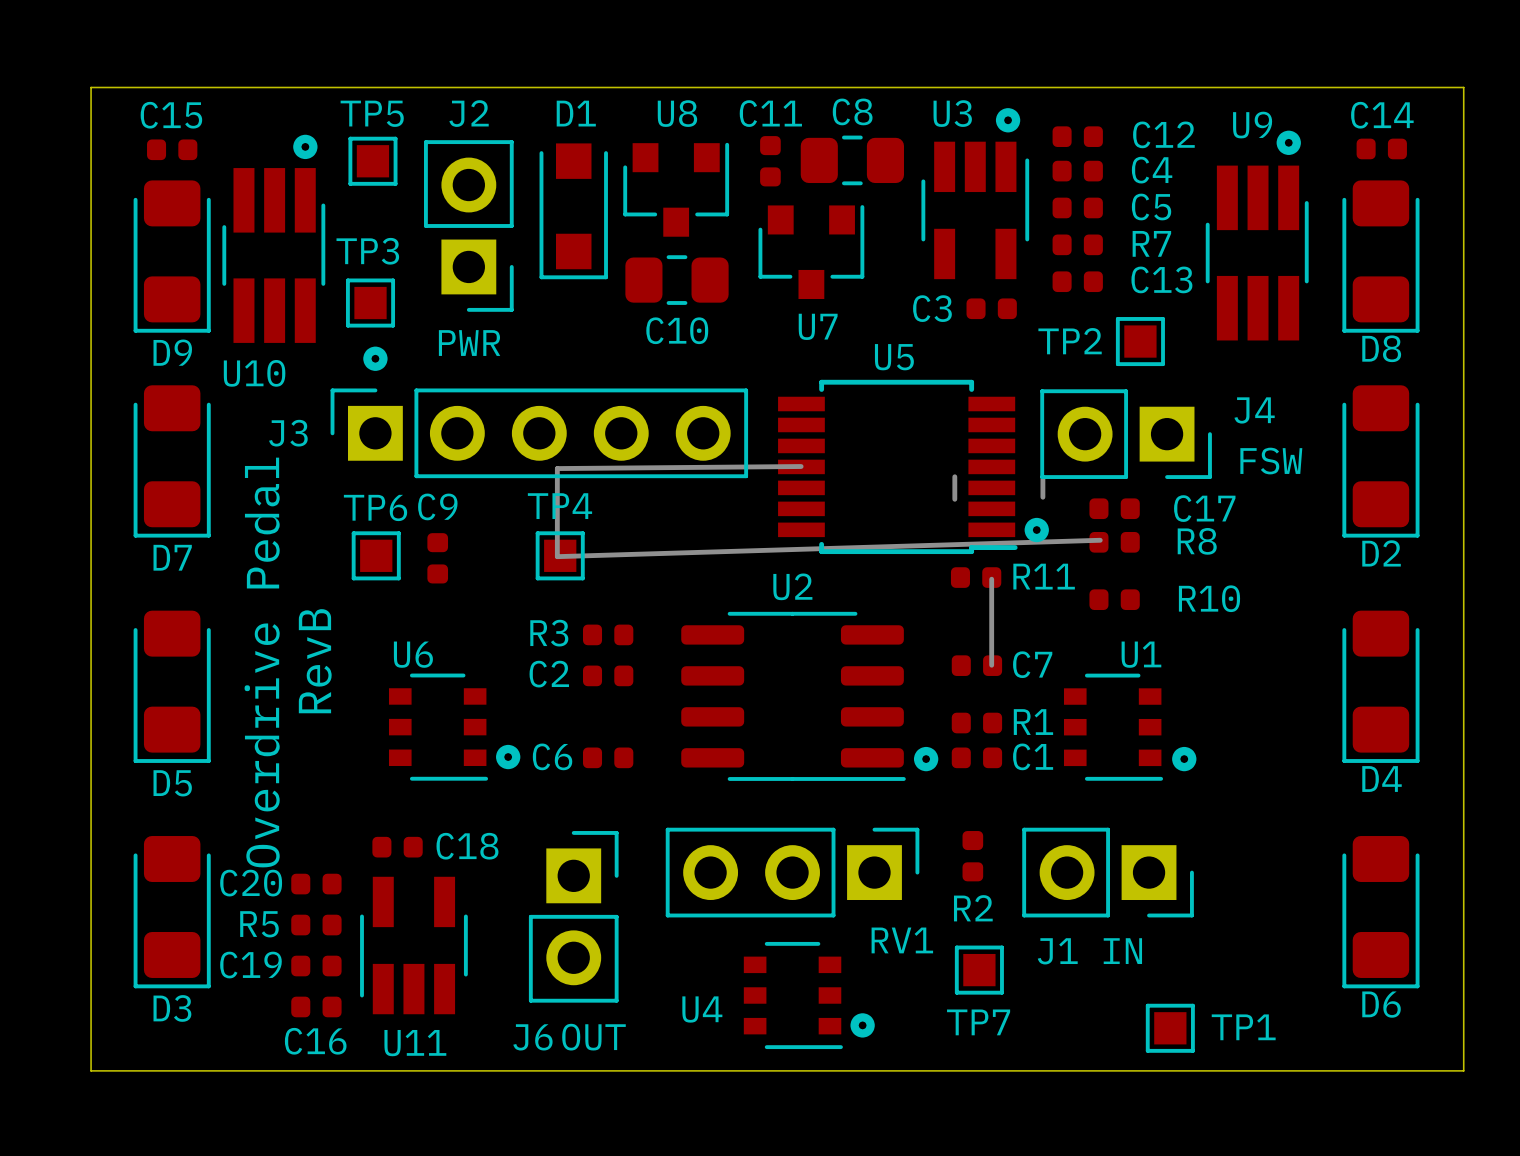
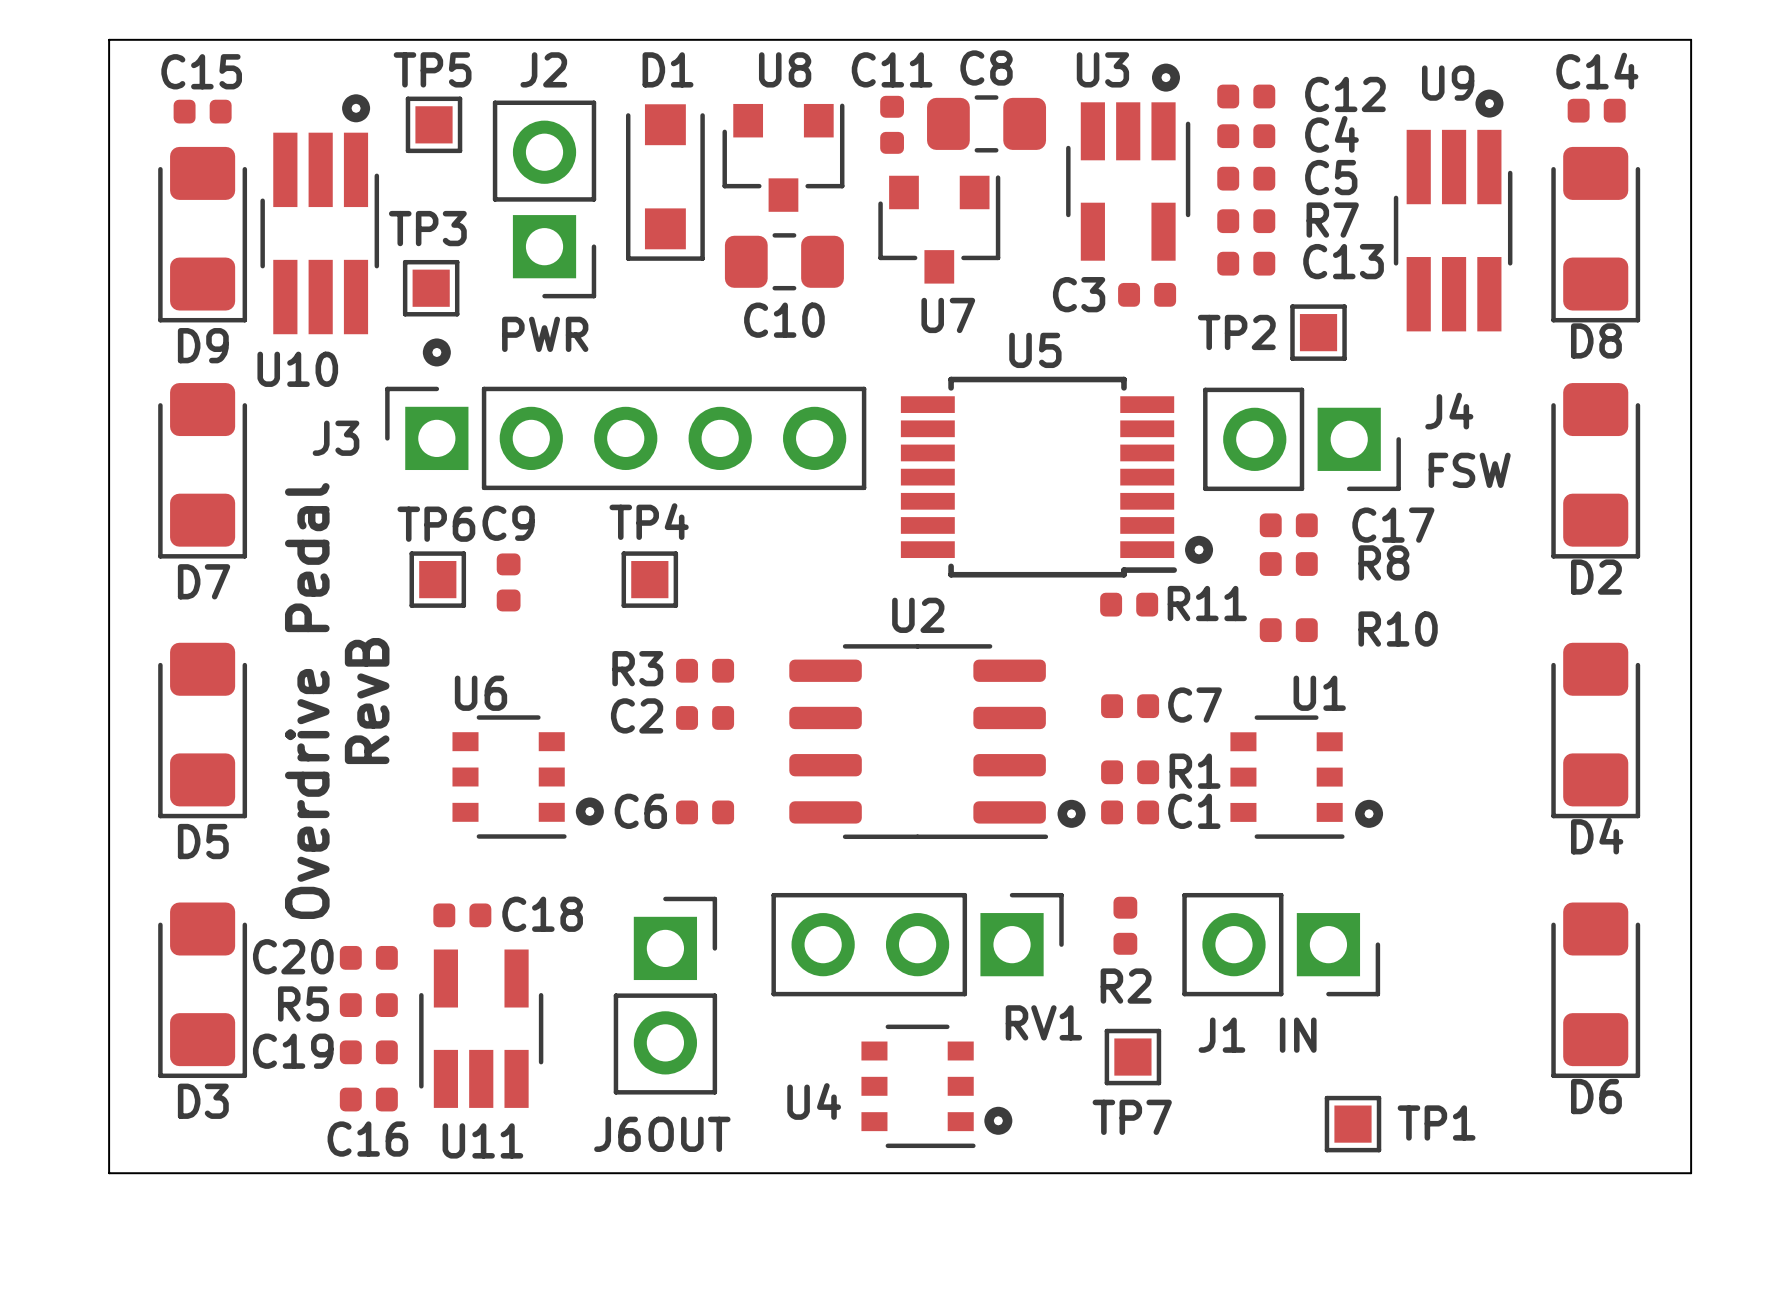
line: (801, 466) (557, 468) (557, 556) (1100, 540) -> none
line: (954, 476) (954, 499) -> none
line: (1042, 478) (1042, 497) -> none
line: (991, 579) (991, 665) -> none

